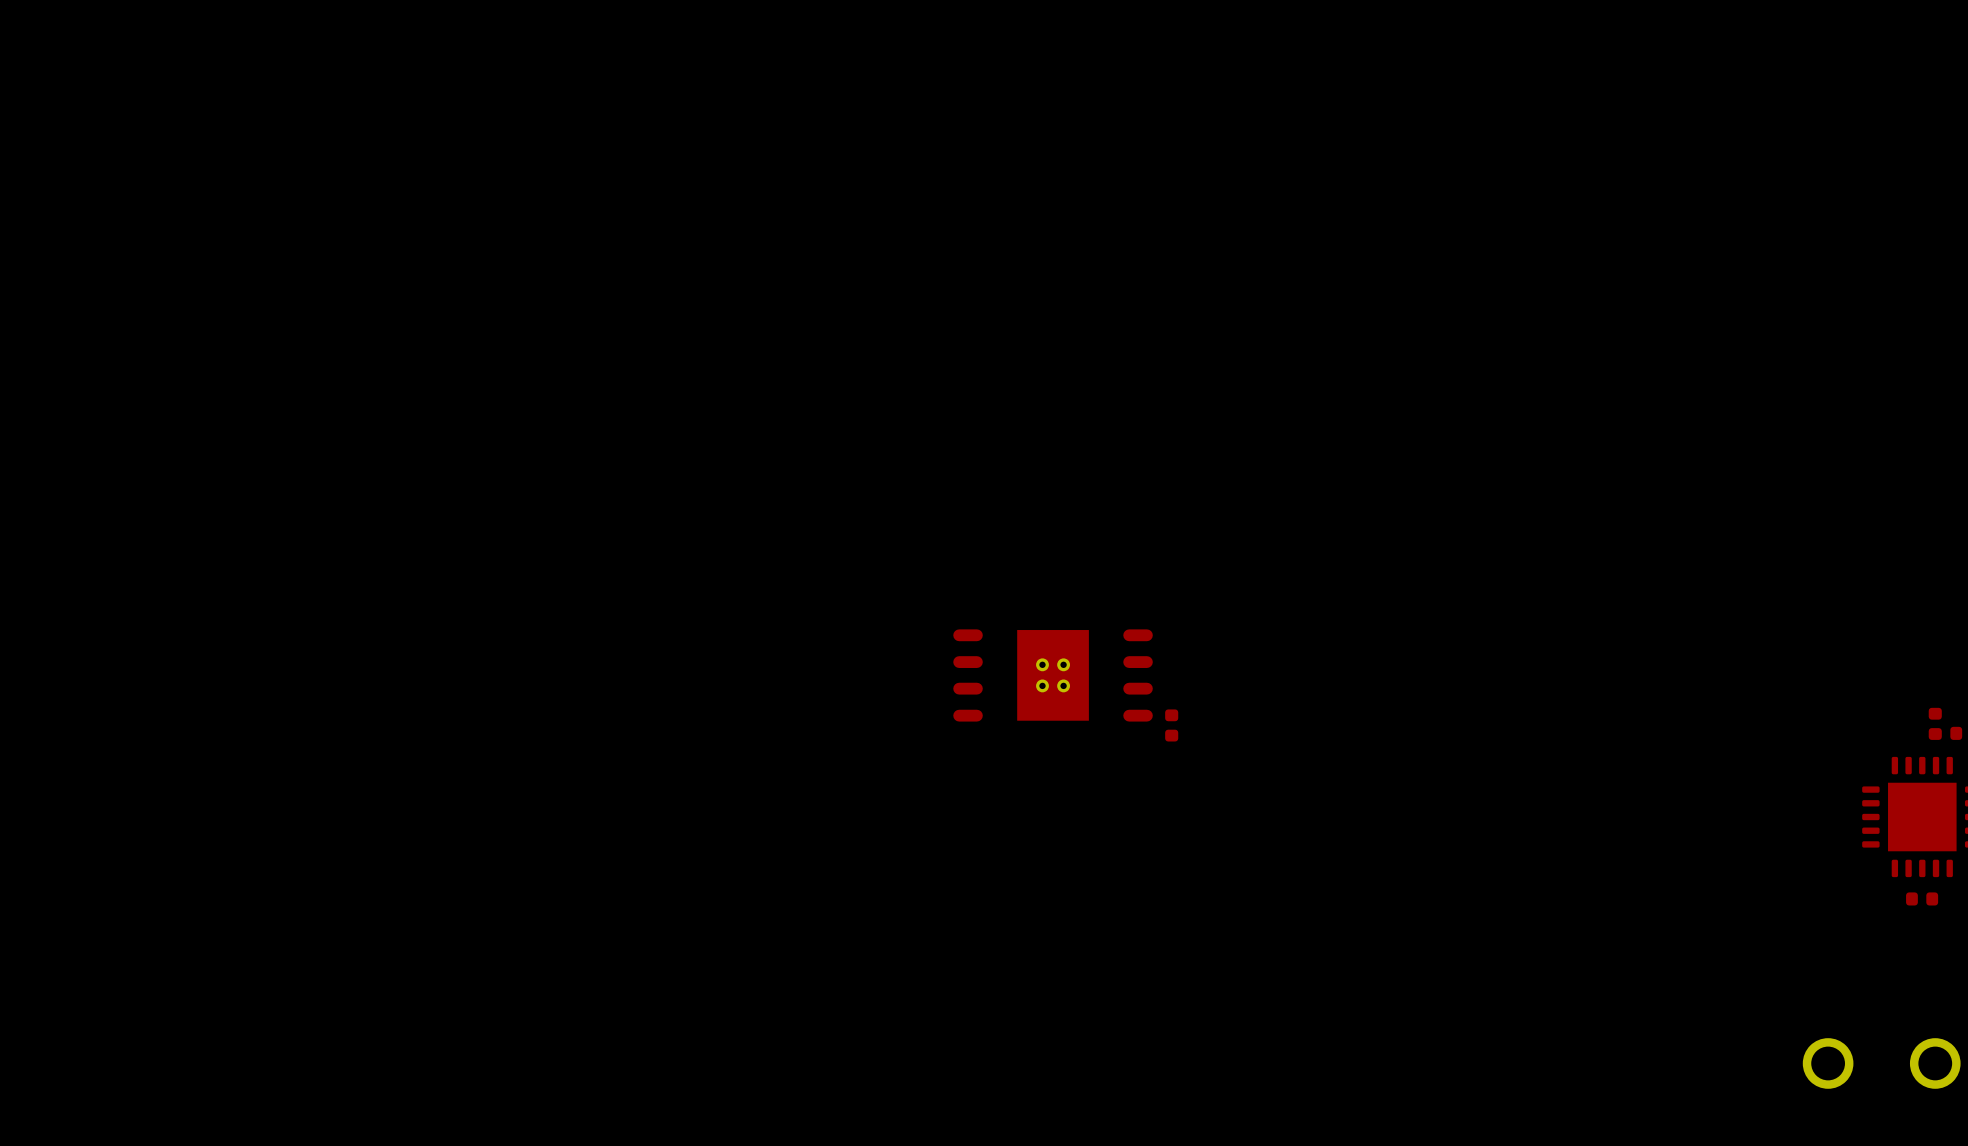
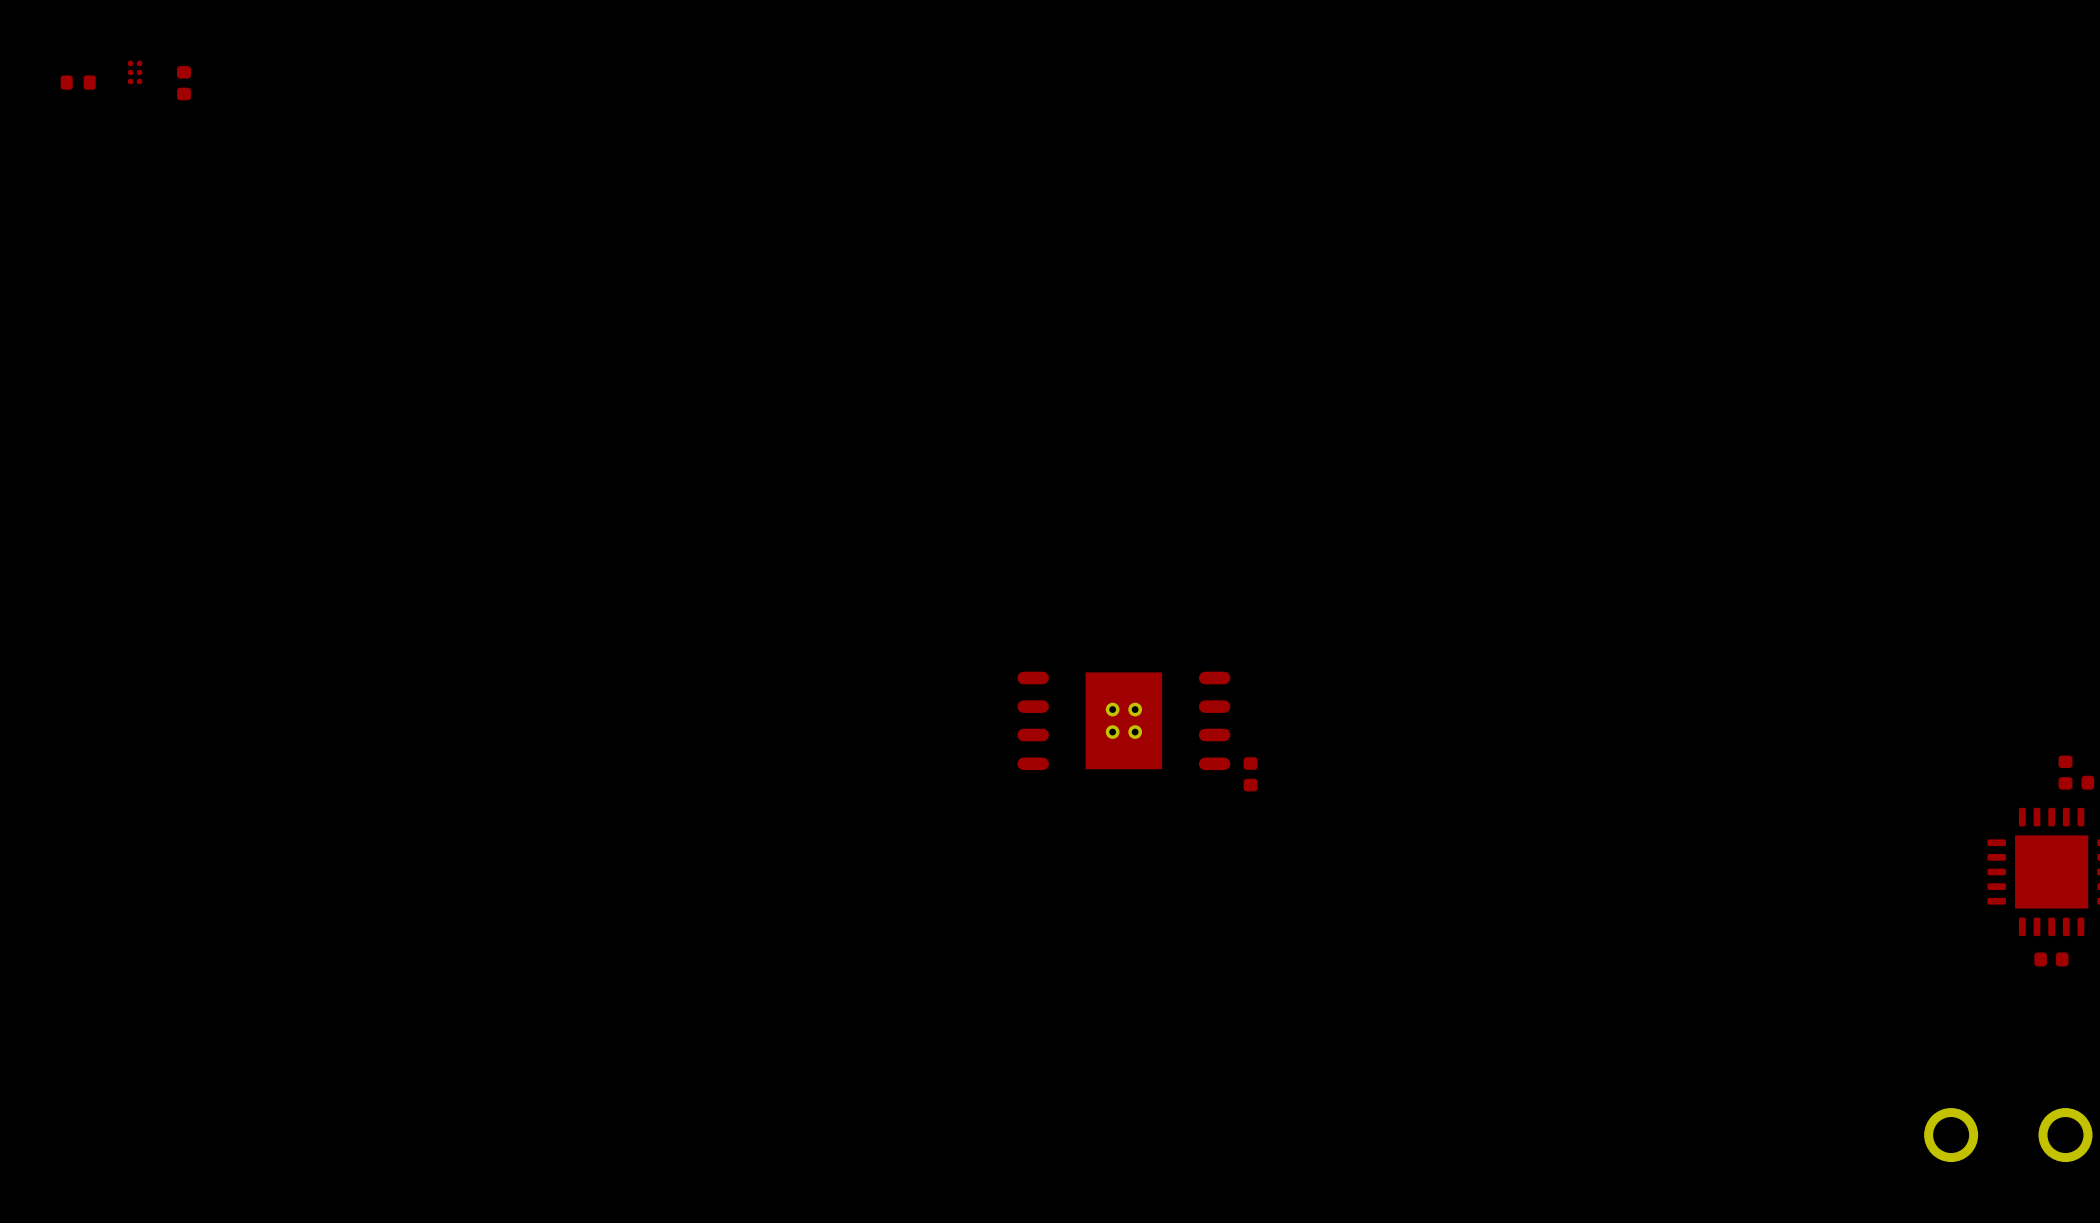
part: none -> (135, 72)
part: none -> (78, 82)
part: none -> (183, 83)

